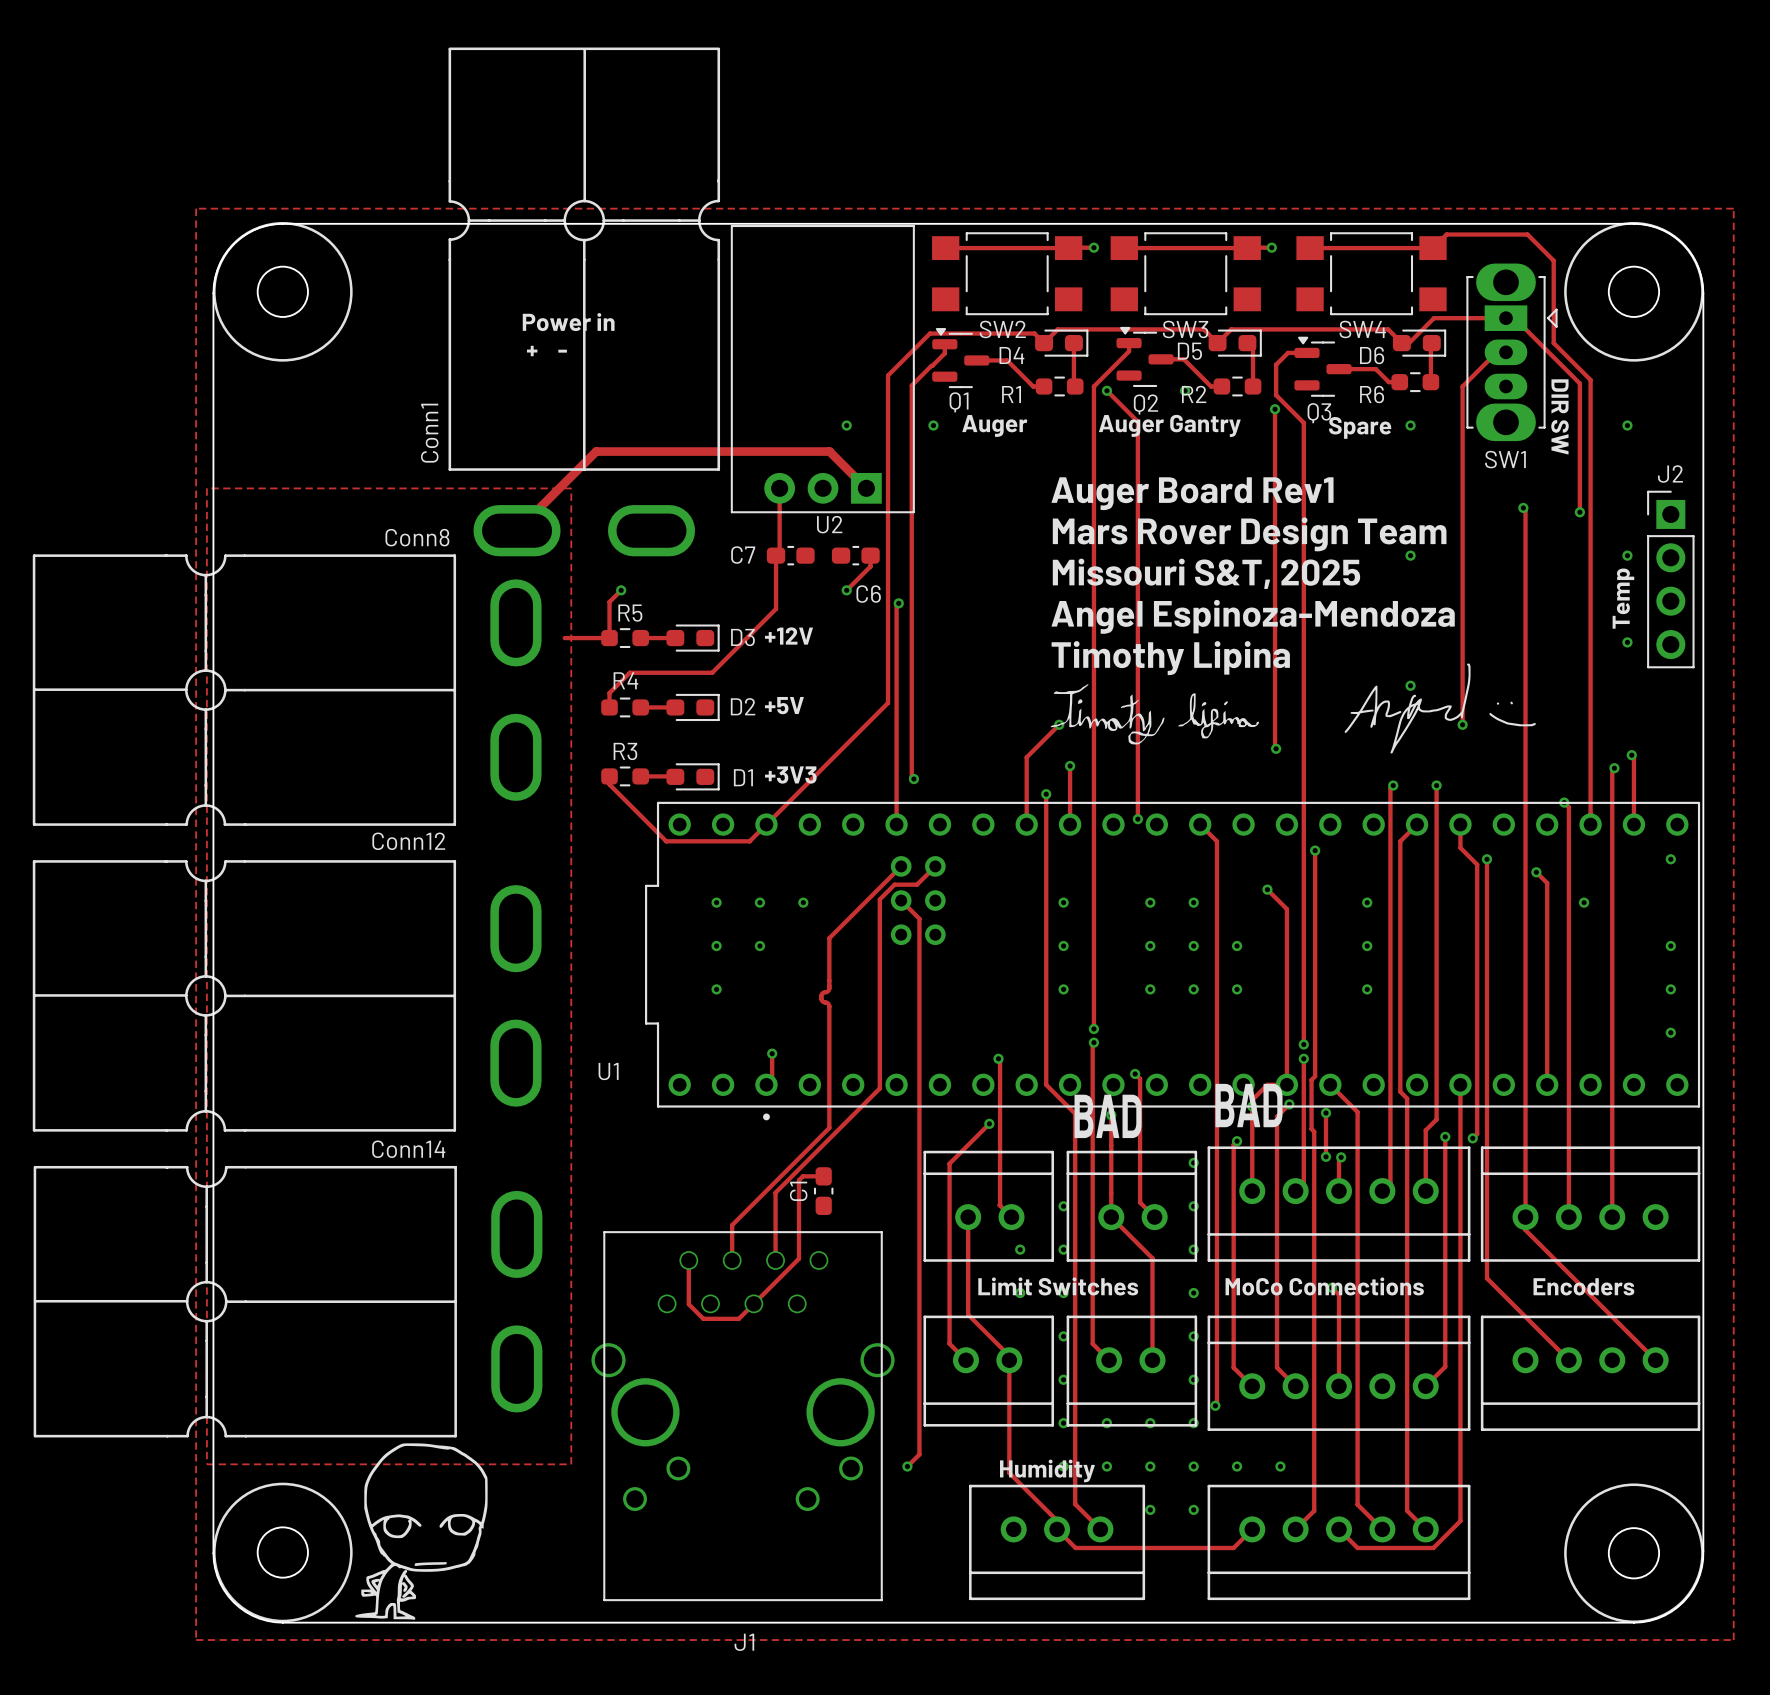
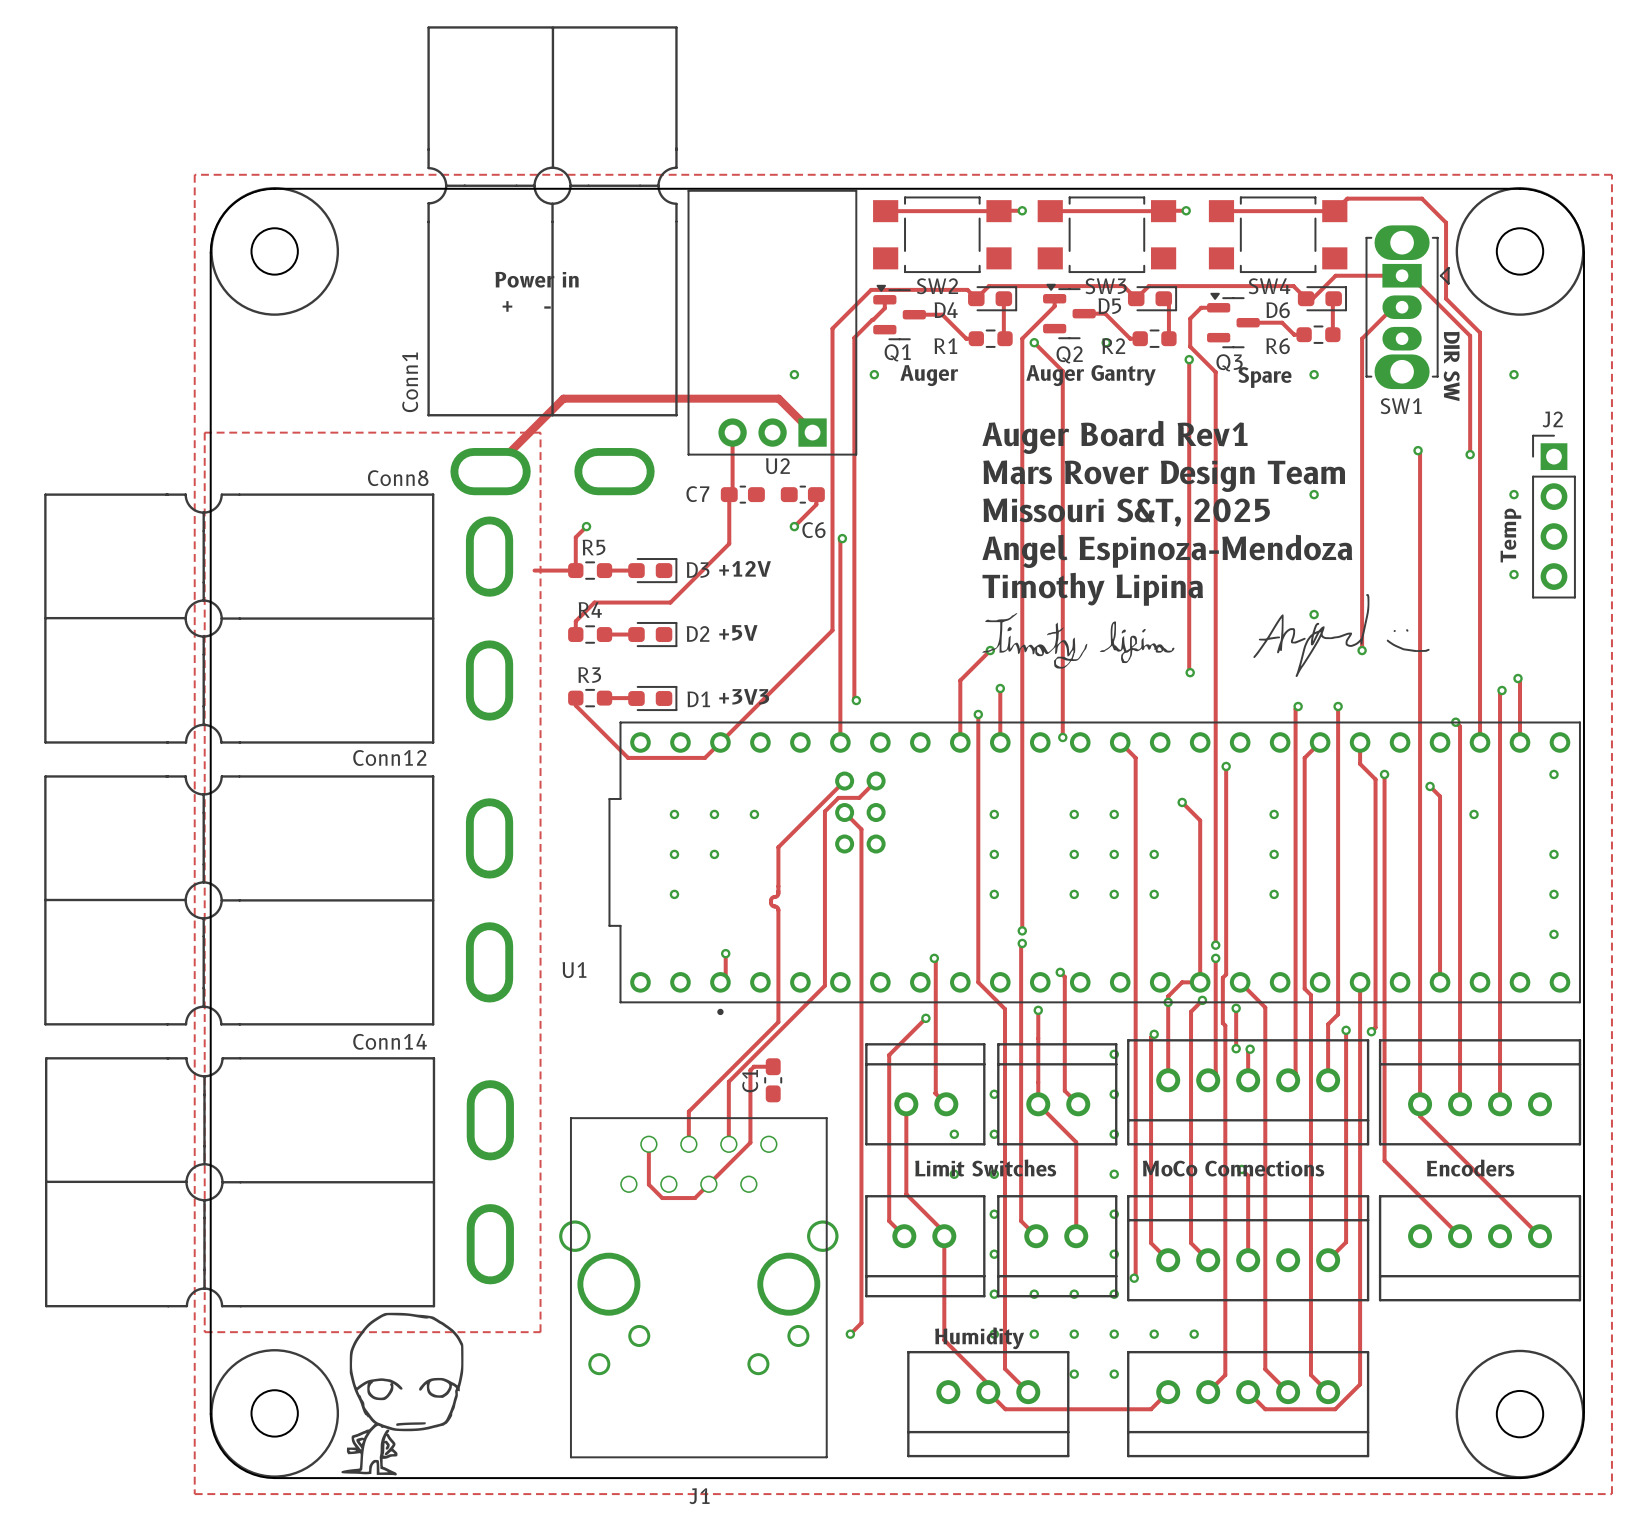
text: BAD (1249, 1105) -> none
text: BAD (1108, 1116) -> none

